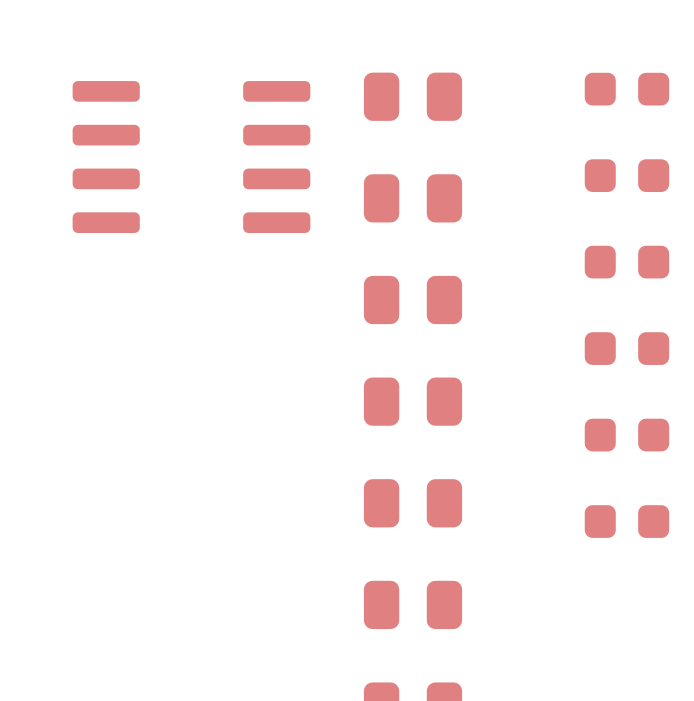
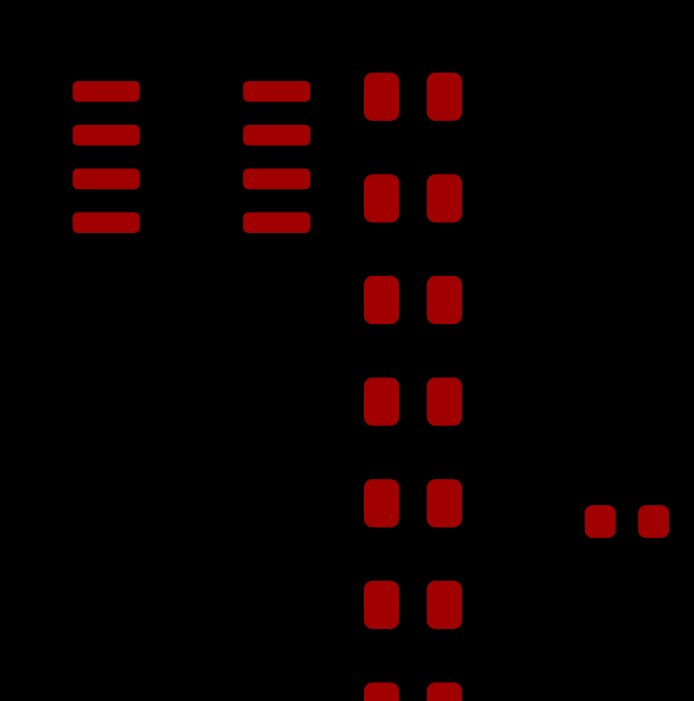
part: (626, 89) -> none
part: (626, 175) -> none
part: (626, 262) -> none
part: (626, 348) -> none
part: (626, 435) -> none

